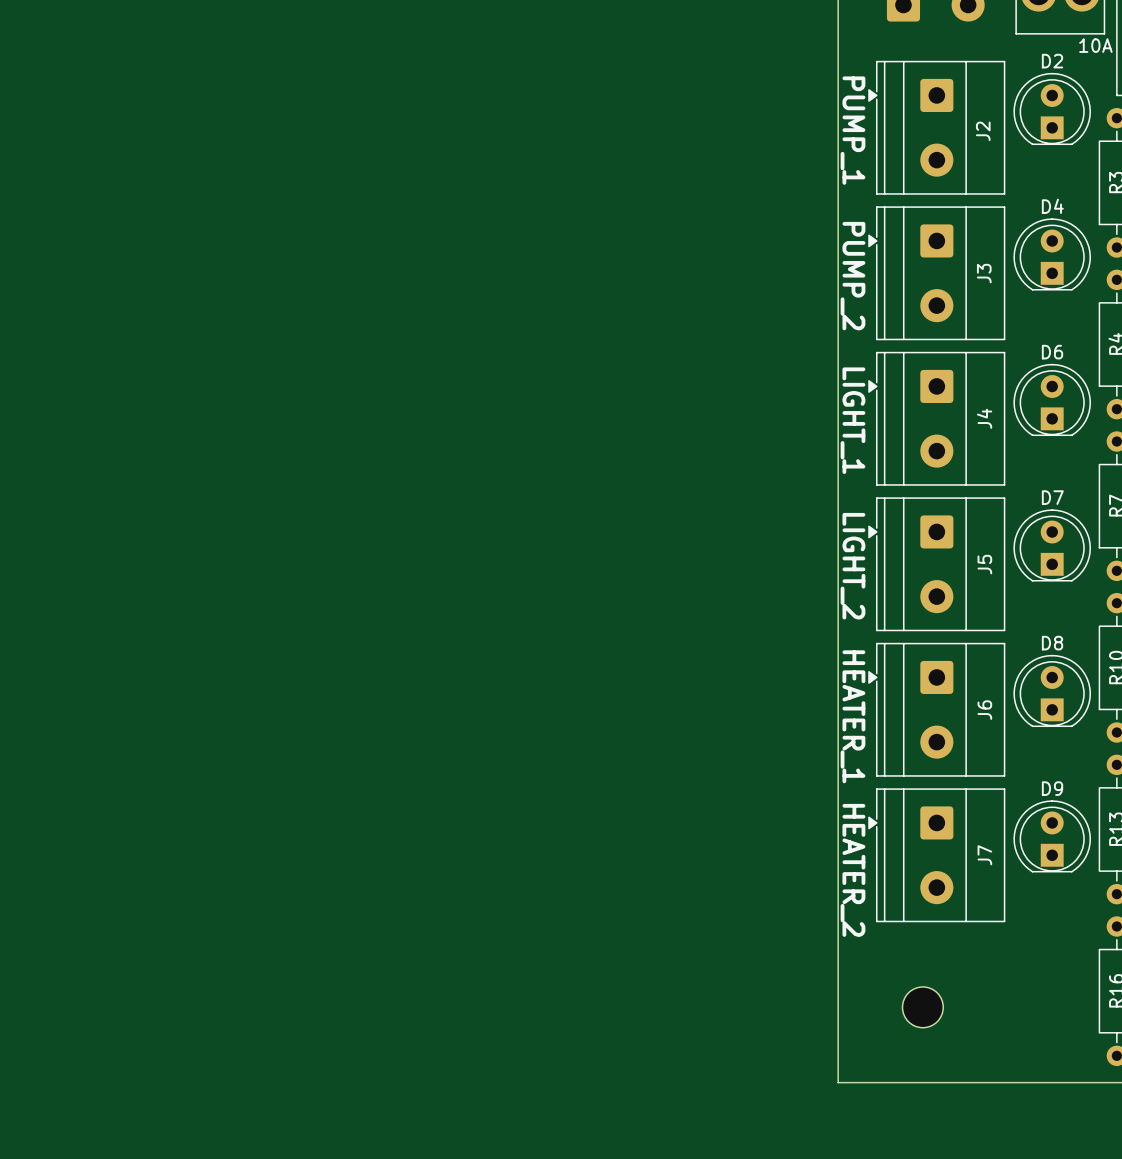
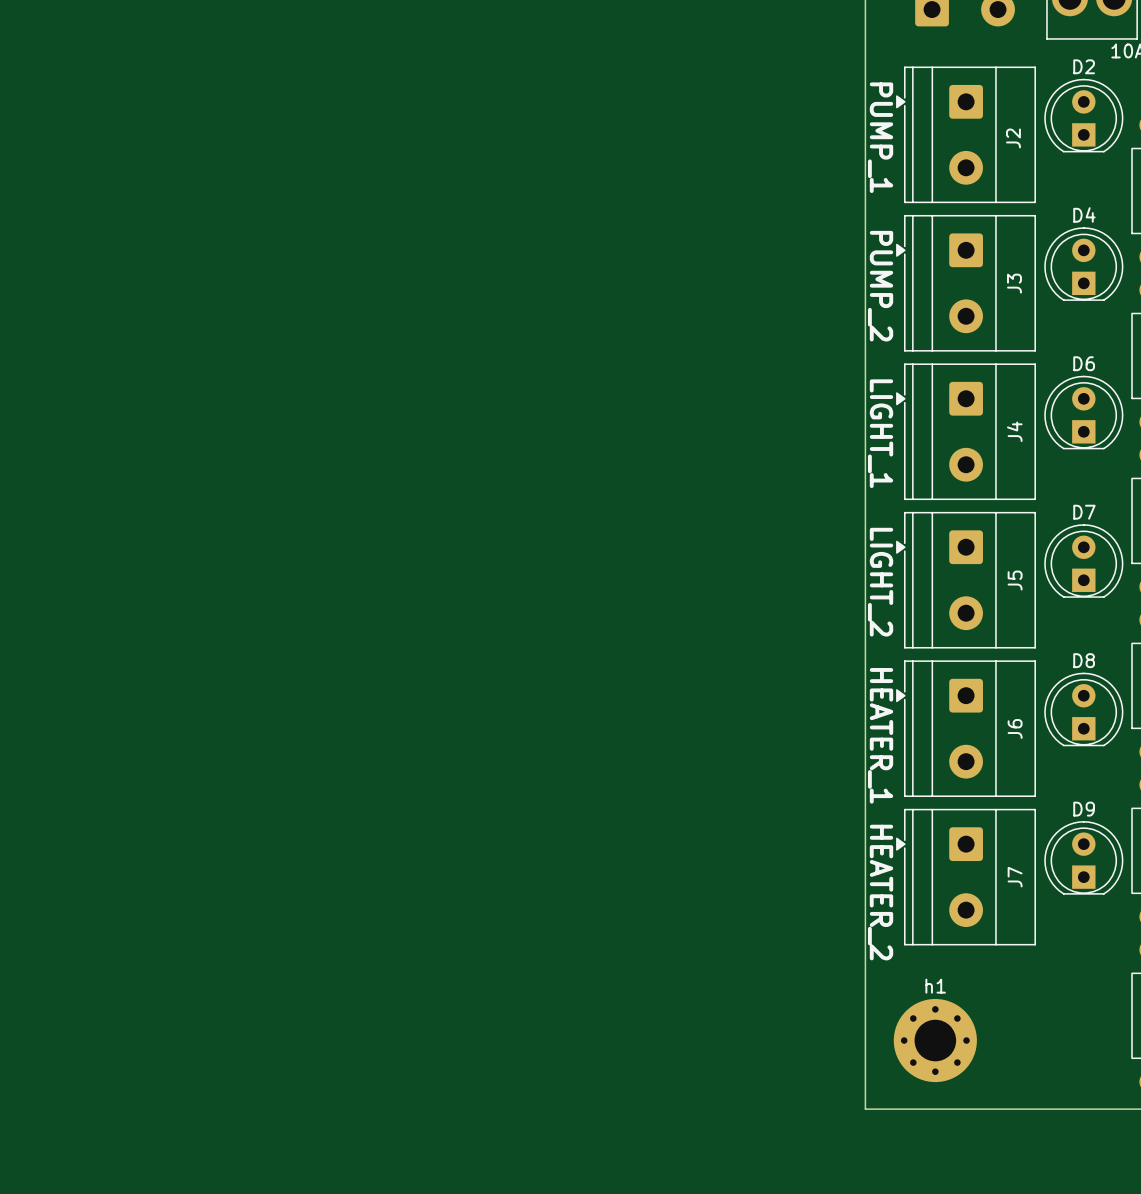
part: (922, 1007) -> none
h1: none -> (935, 1040)

